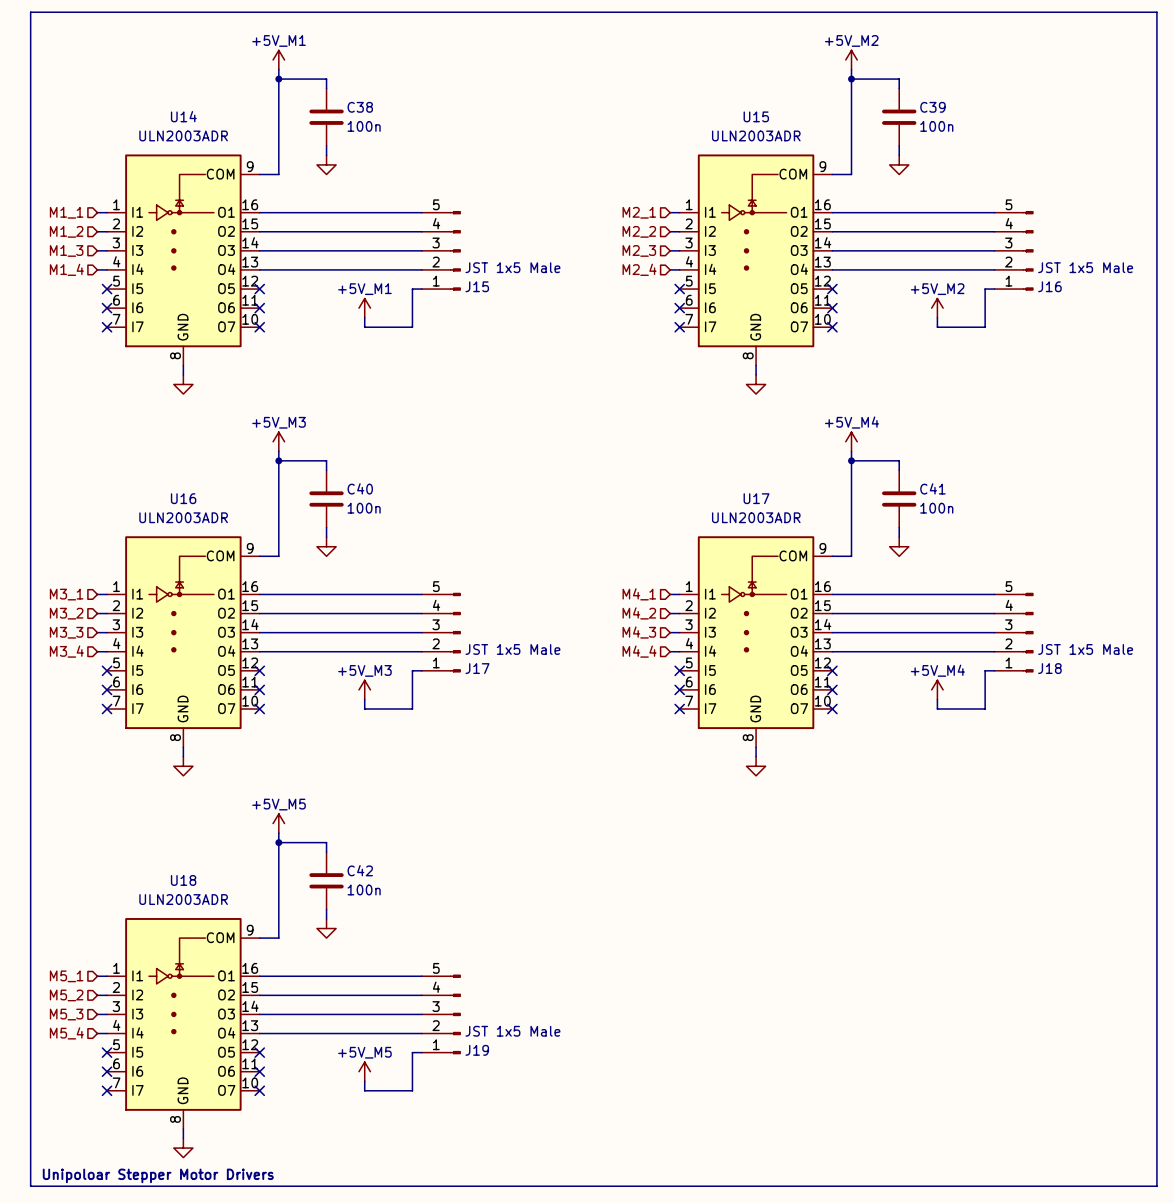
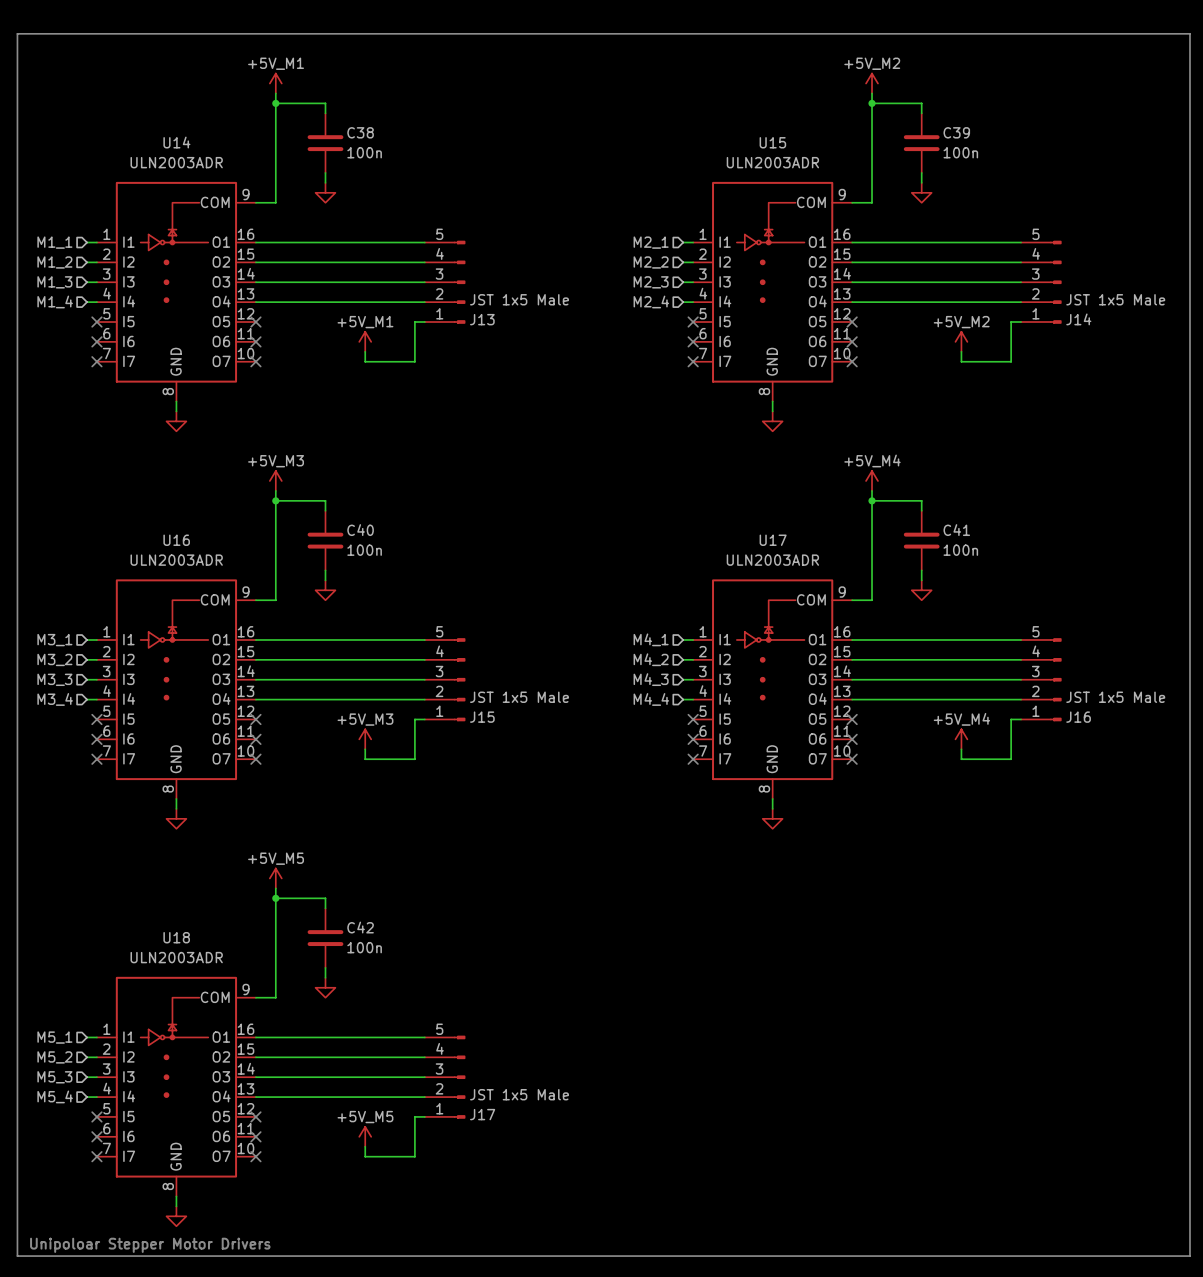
J15 name: J15 (477, 286) -> J13 (482, 319)
J16 name: J16 (1049, 286) -> J14 (1078, 319)
J17 name: J17 (477, 668) -> J15 (482, 717)
J18 name: J18 (1049, 668) -> J16 (1078, 717)
J19 name: J19 (477, 1050) -> J17 (482, 1114)

